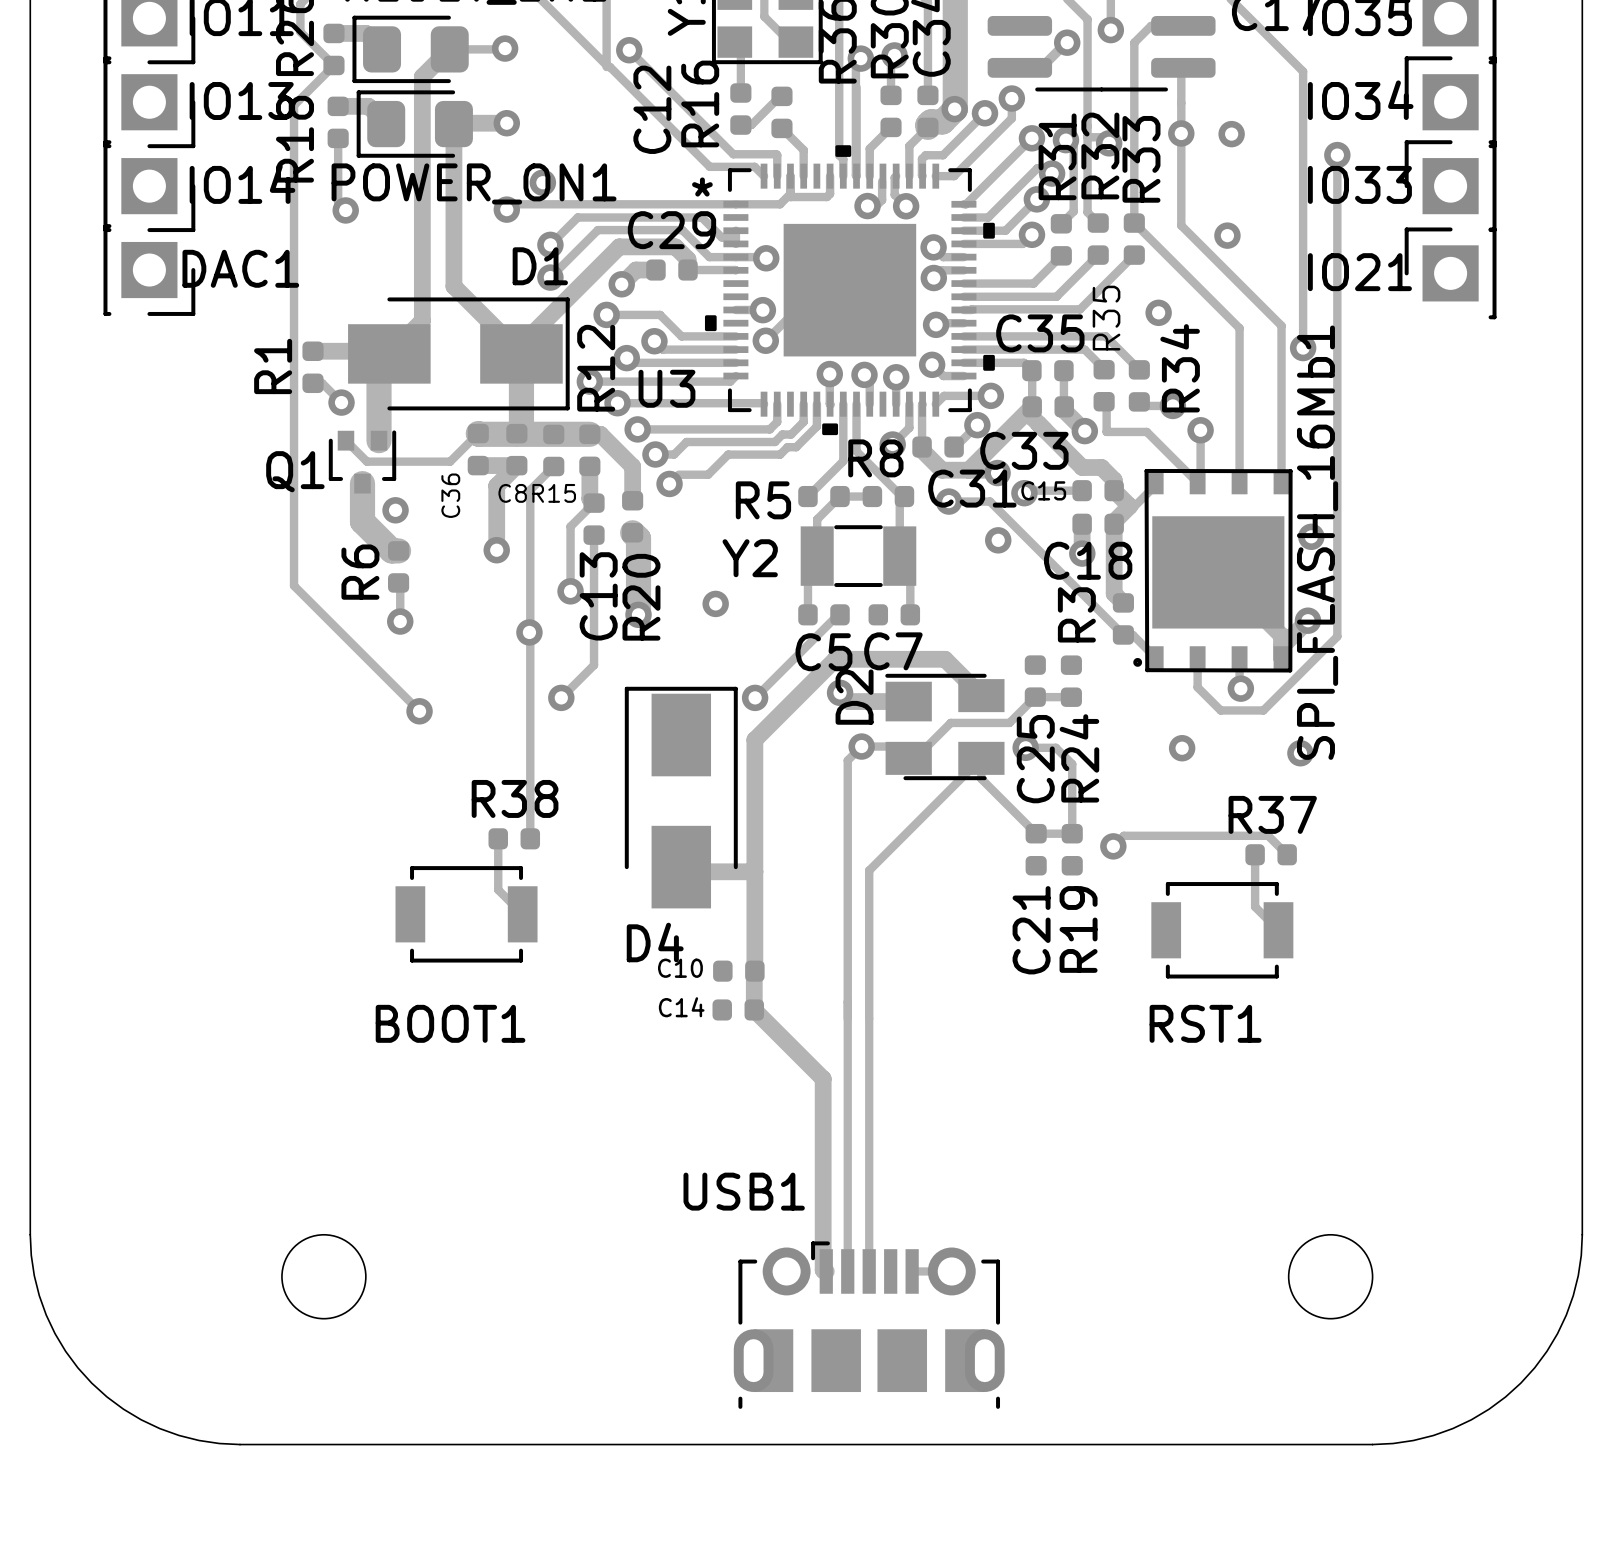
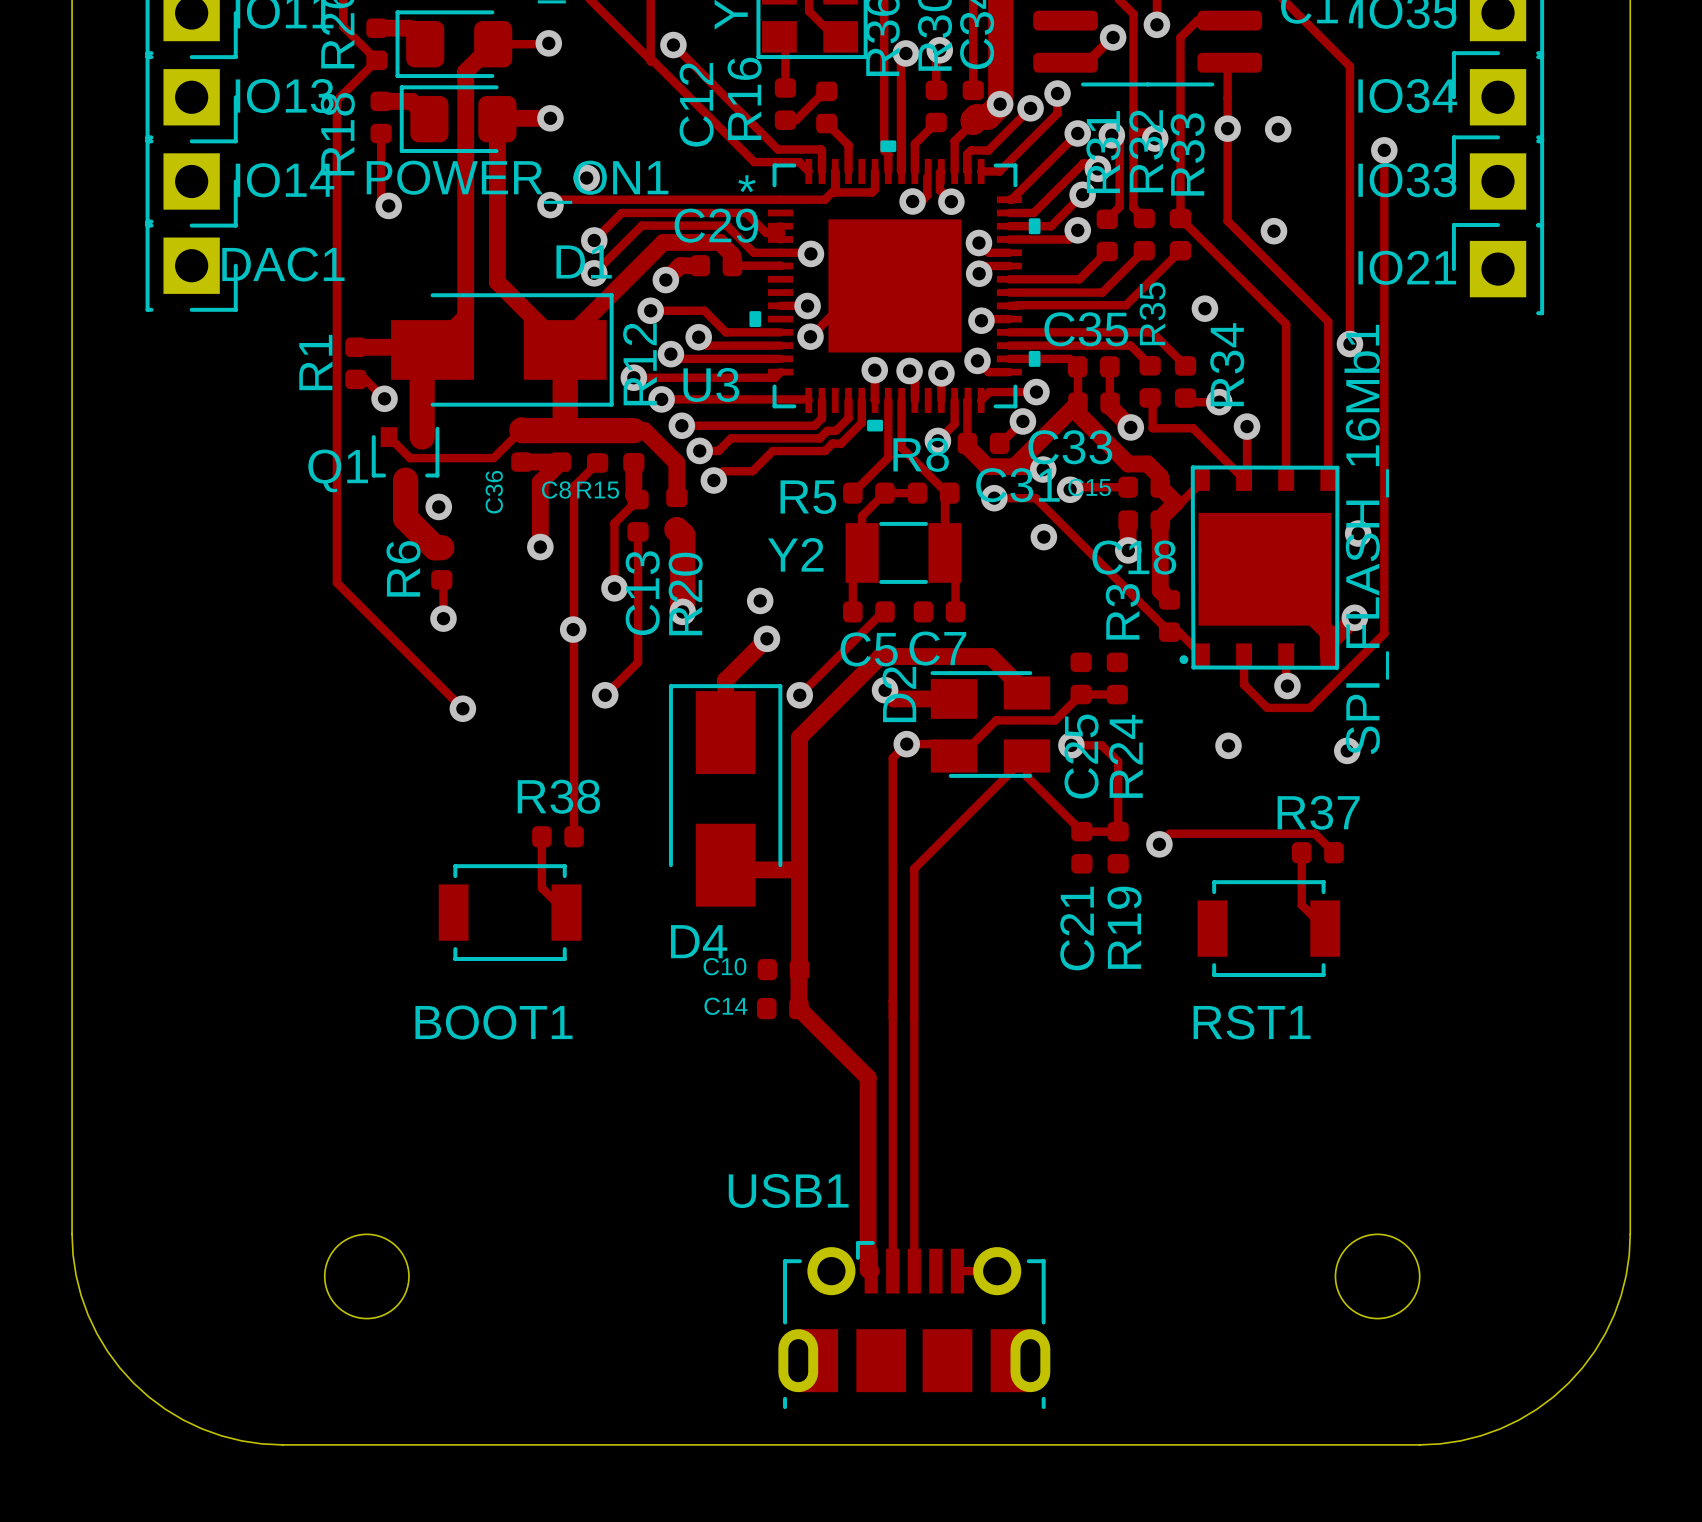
track: none -> (766, 638) (725, 680) (725, 732)
via: none -> (766, 638)

